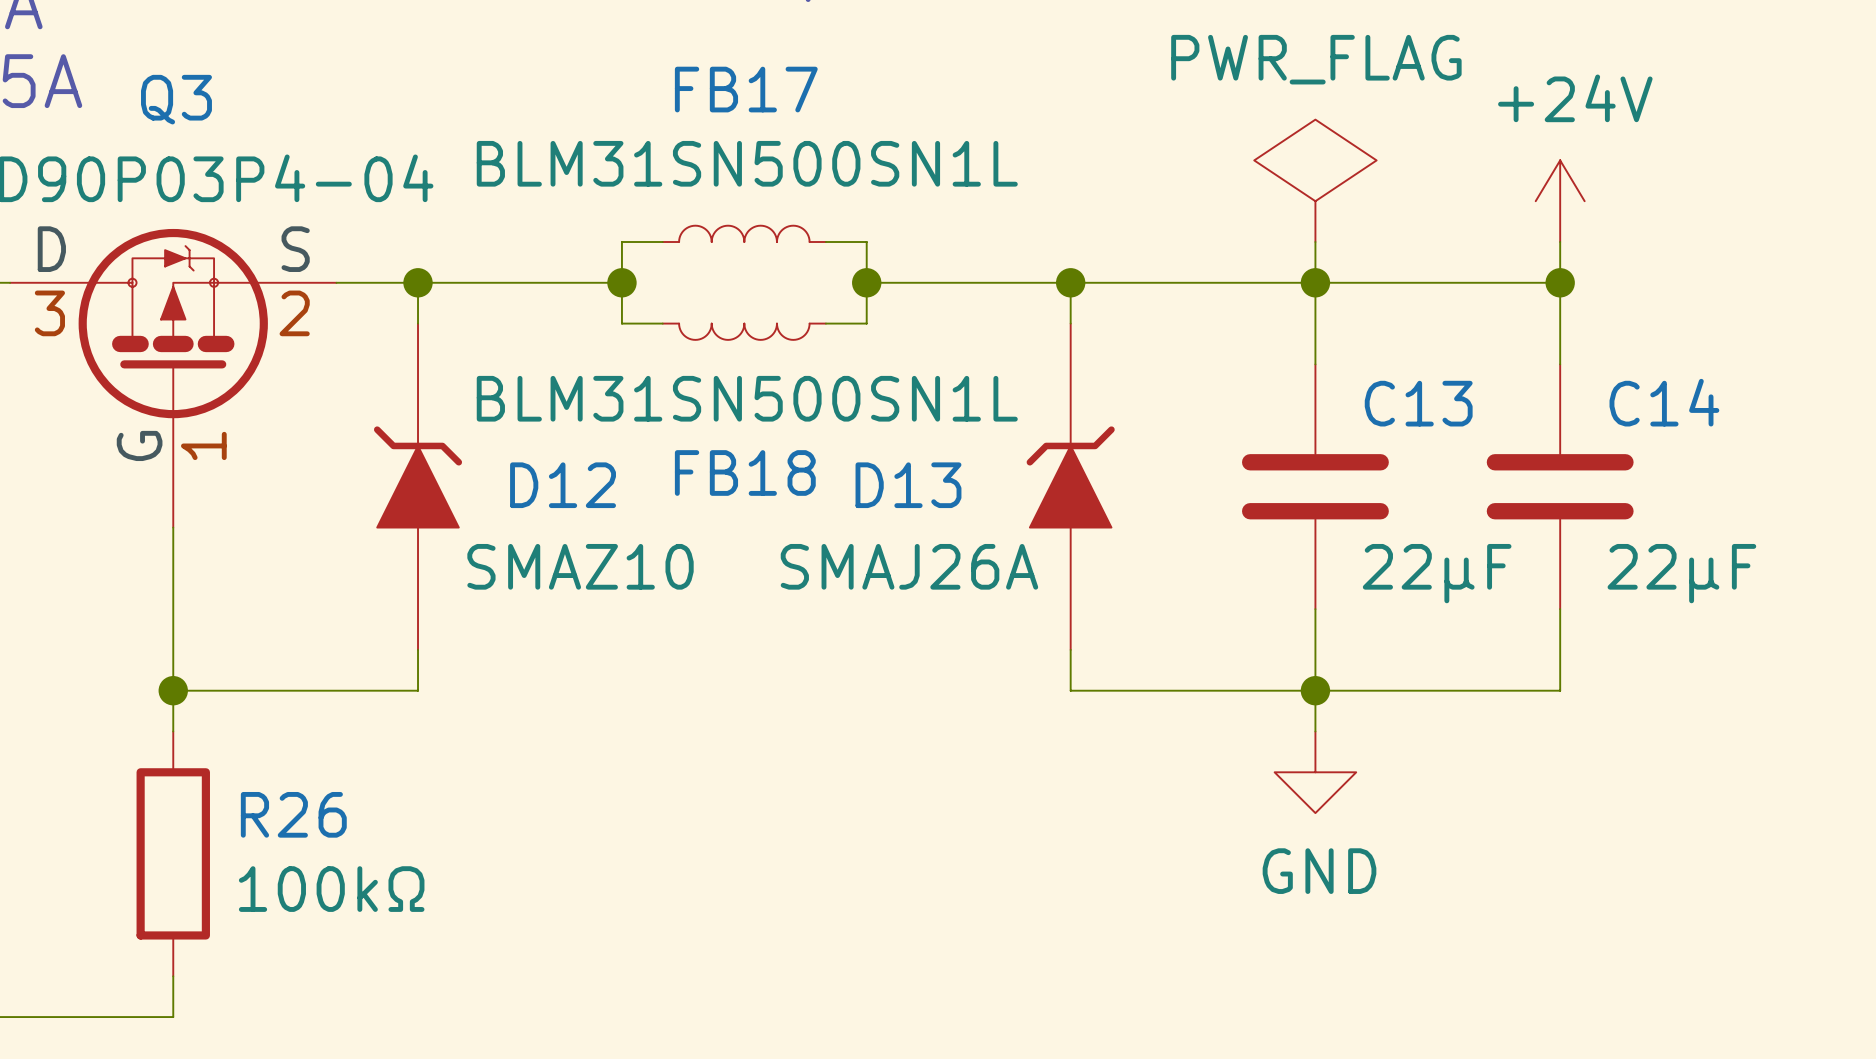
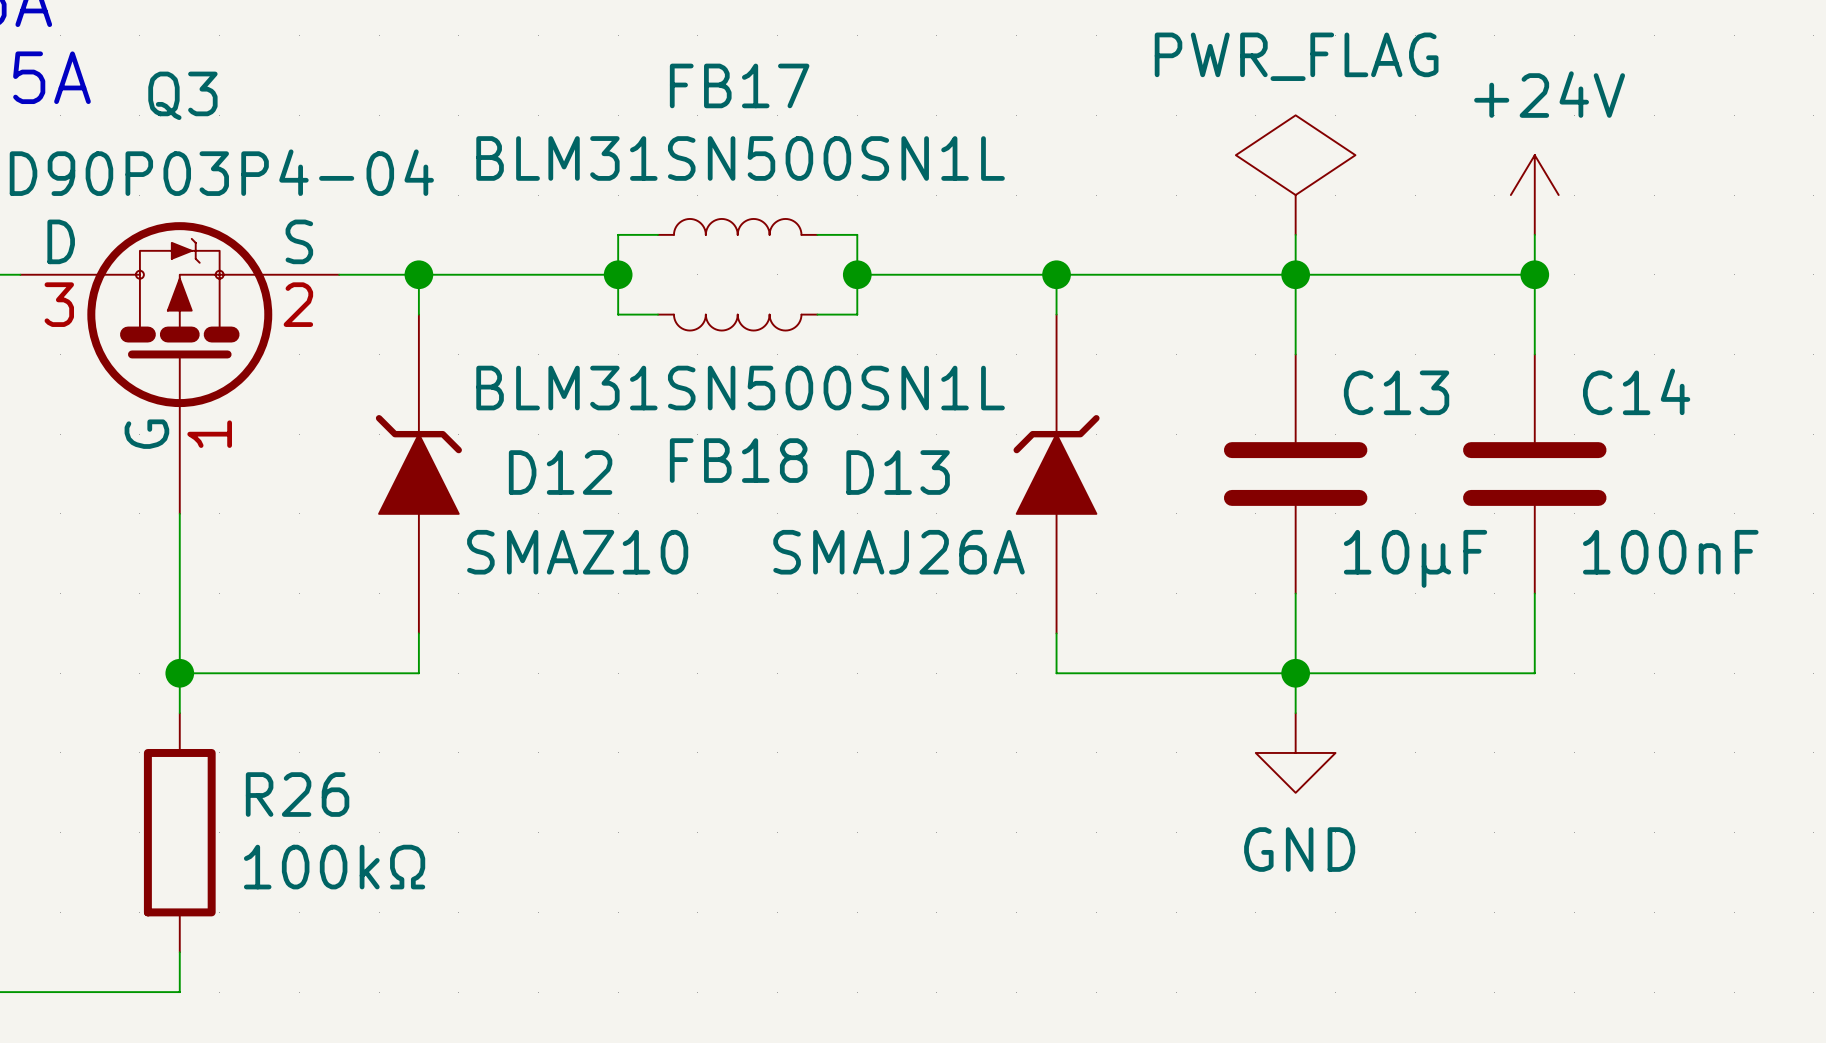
C13 value: 22μF (1437, 573) -> 10μF (1415, 558)
C14 value: 22μF (1681, 573) -> 100nF (1670, 552)

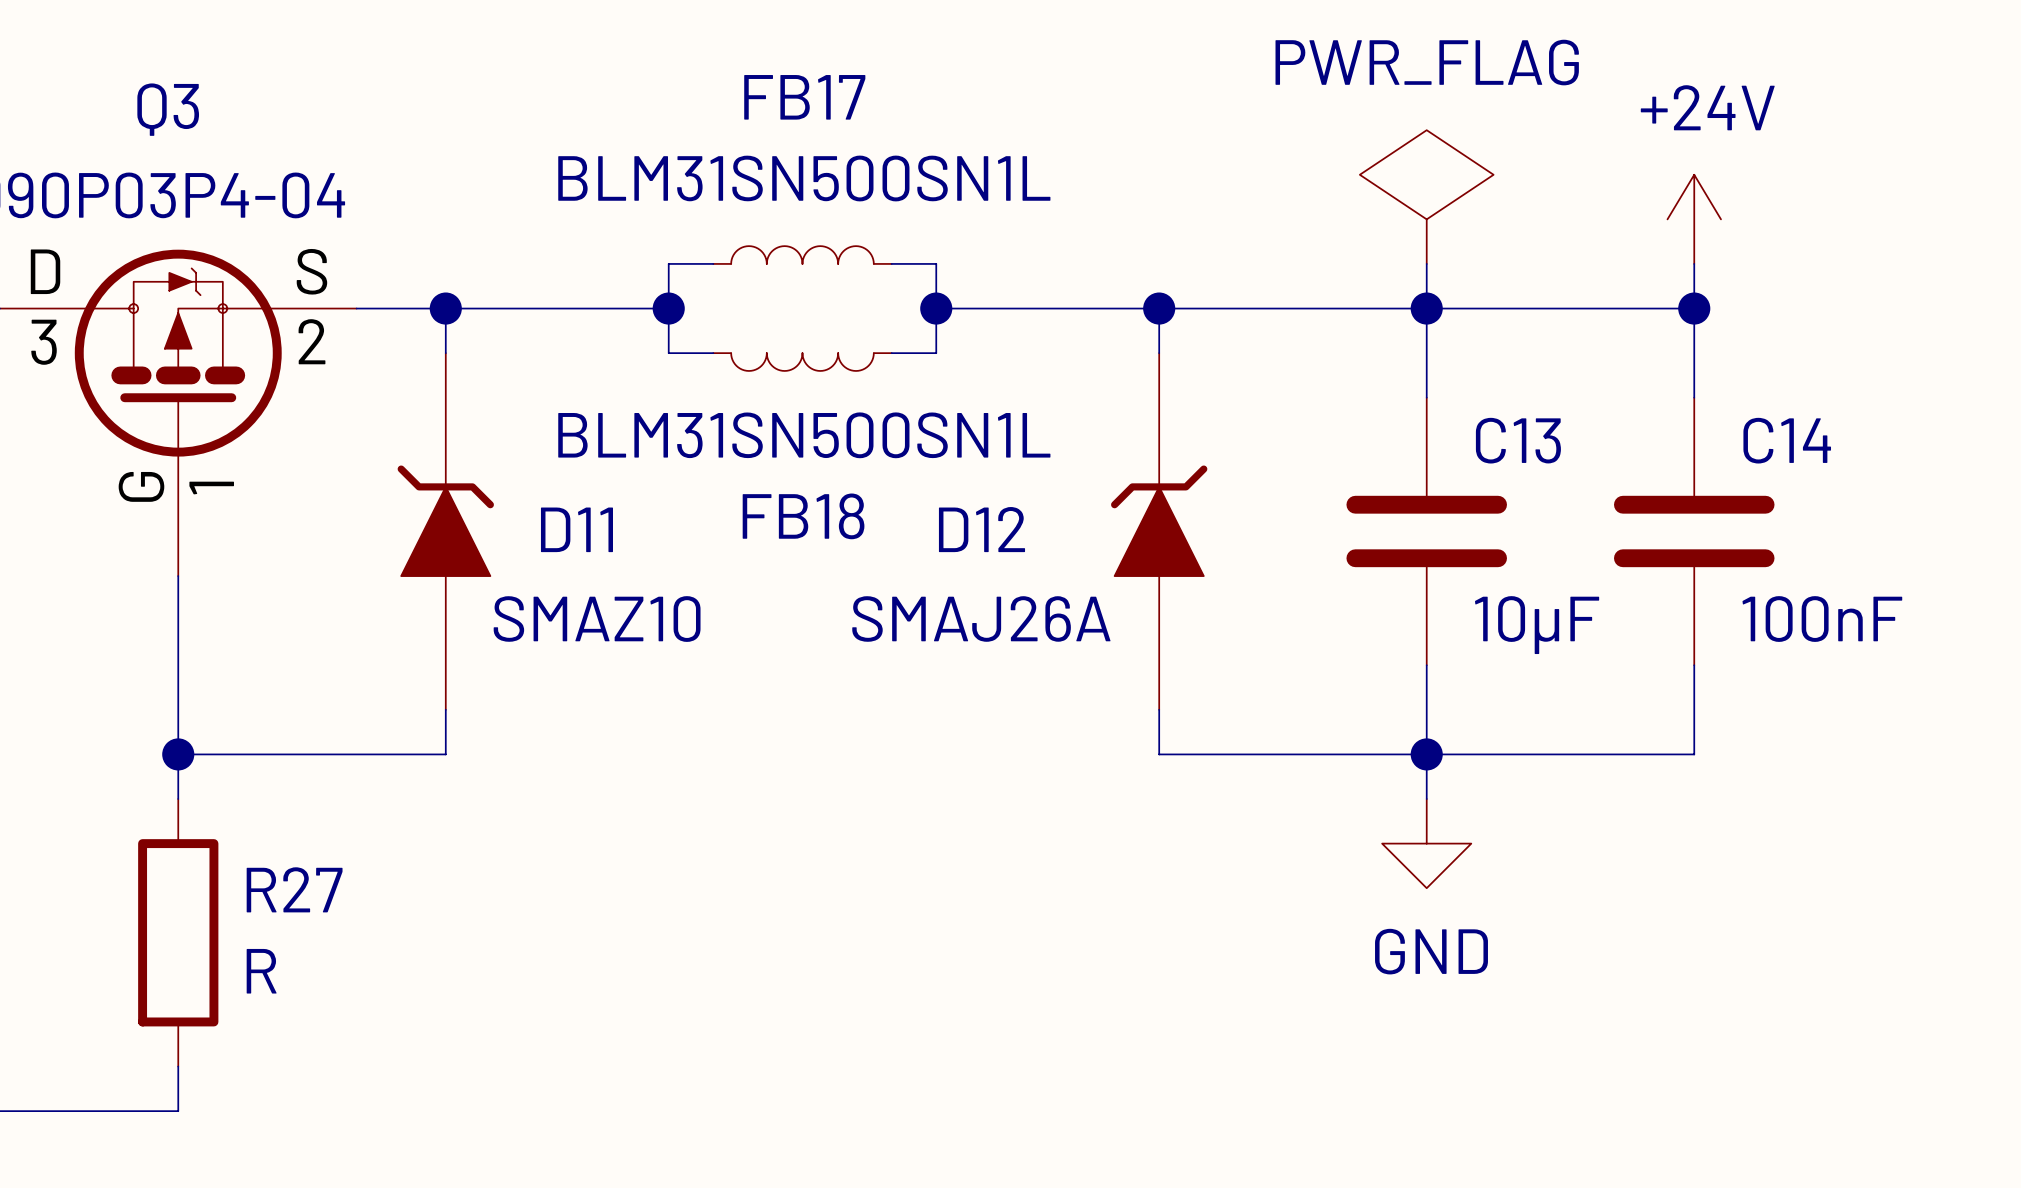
D12 name: D12 (560, 472) -> D11 (576, 529)
D13 name: D13 (898, 472) -> D12 (981, 529)
R26 name: R26 (297, 794) -> R27 (294, 889)
R26 value: 100kΩ (334, 867) -> R (261, 971)

